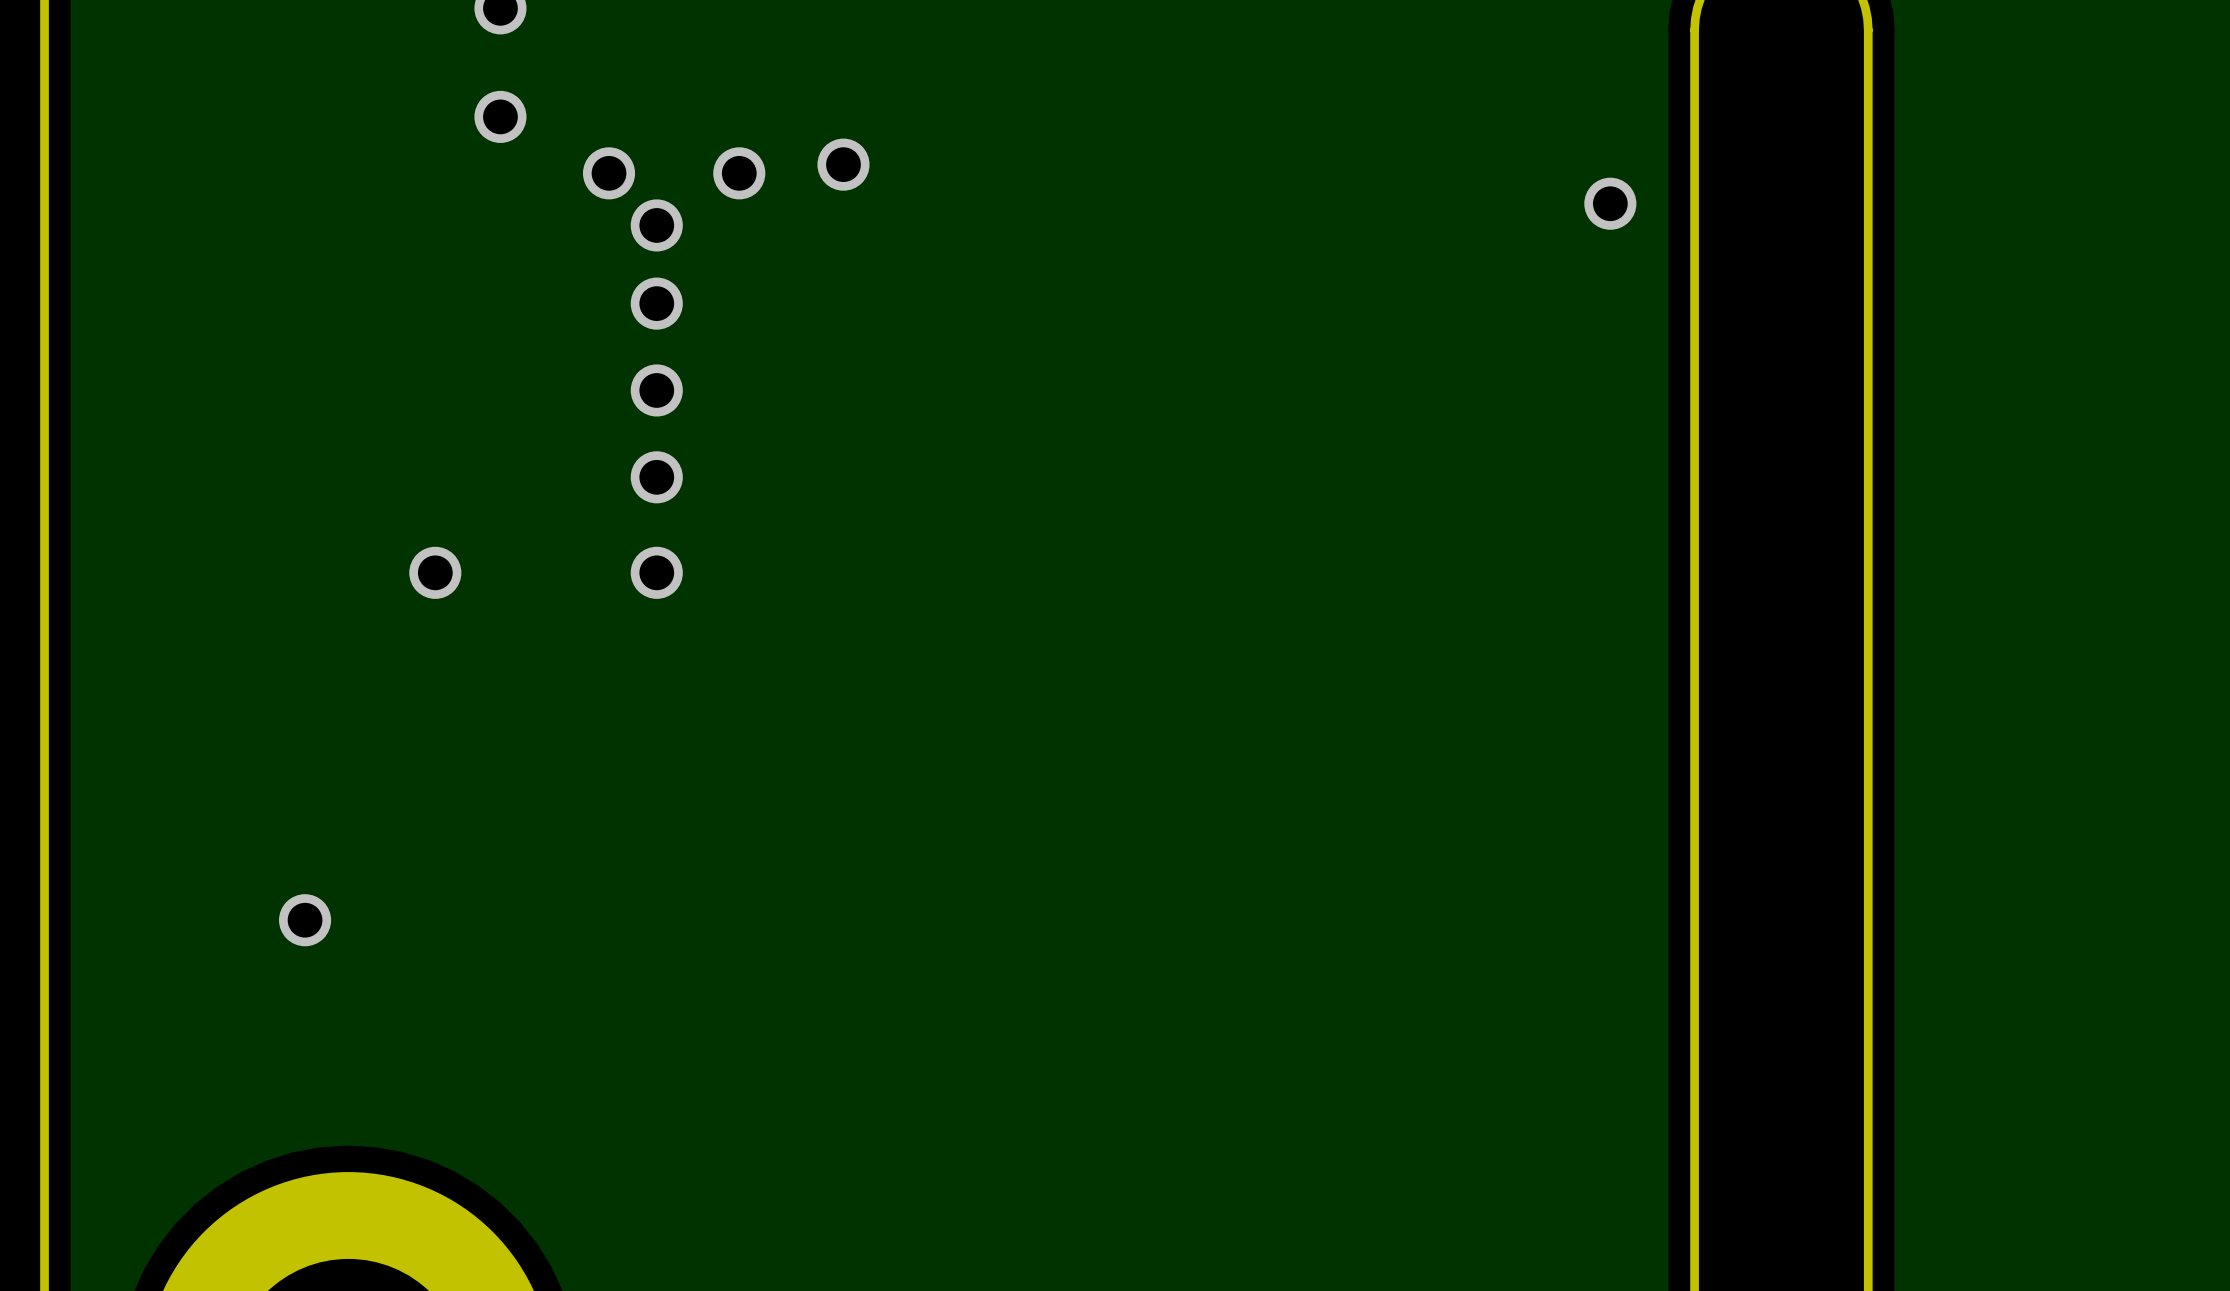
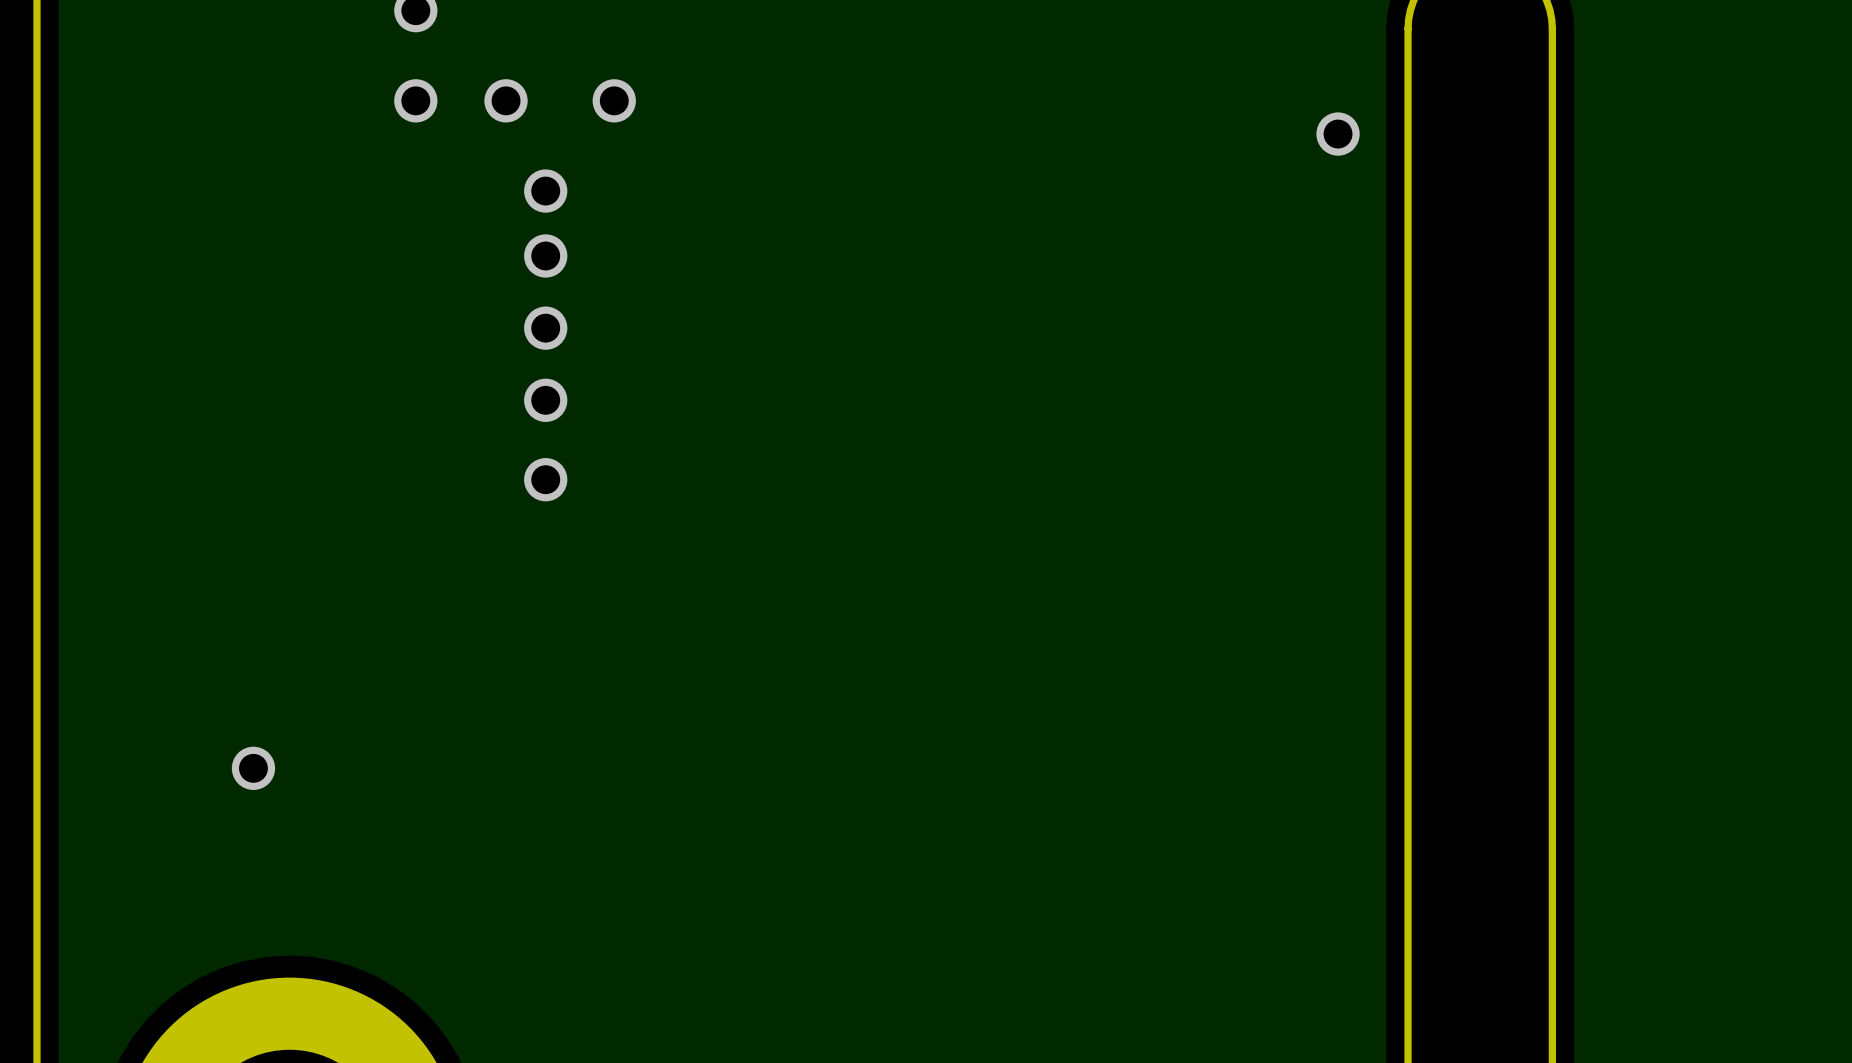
via: (843, 164) -> none
via position: (609, 173) -> (506, 100)
via position: (739, 173) -> (614, 100)
via position: (1610, 203) -> (1338, 134)
via: (435, 572) -> none

